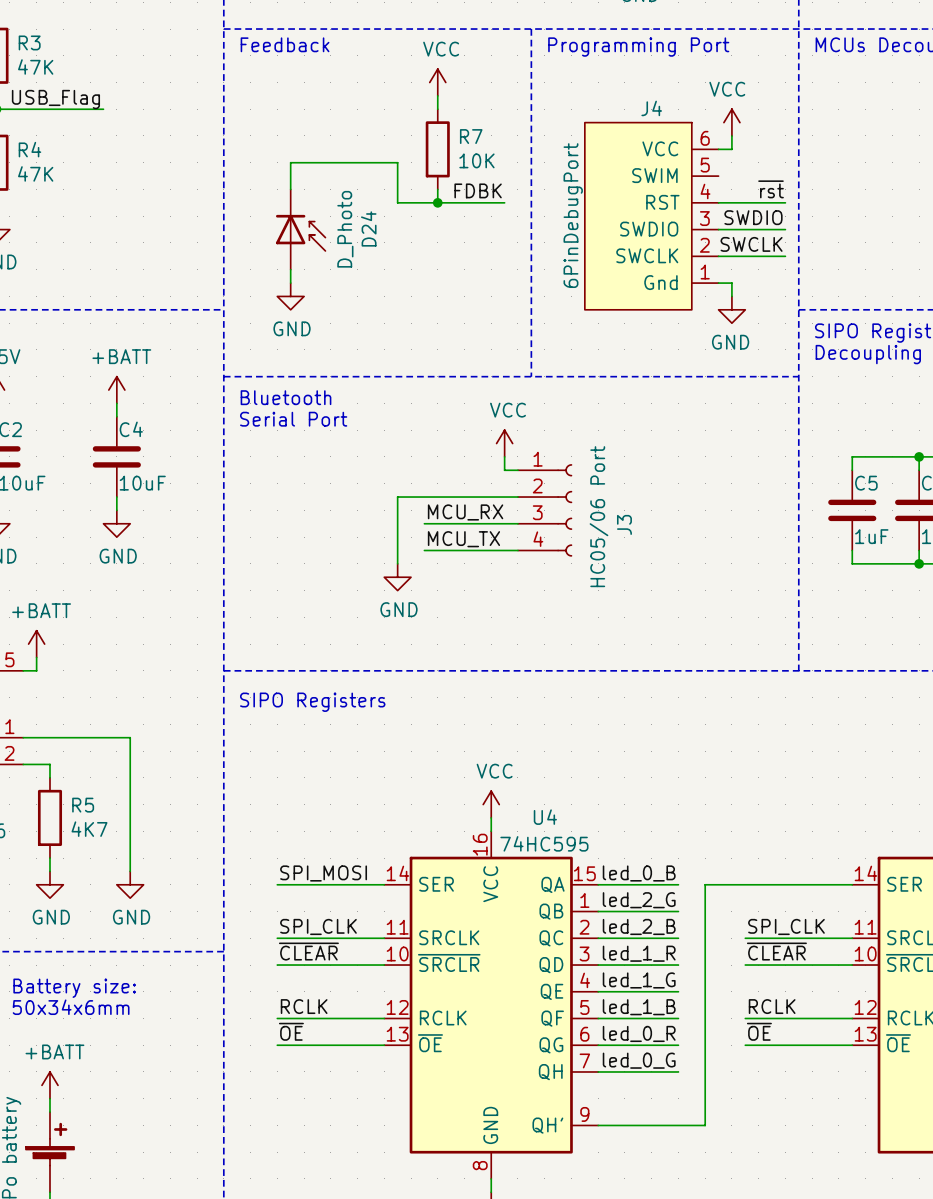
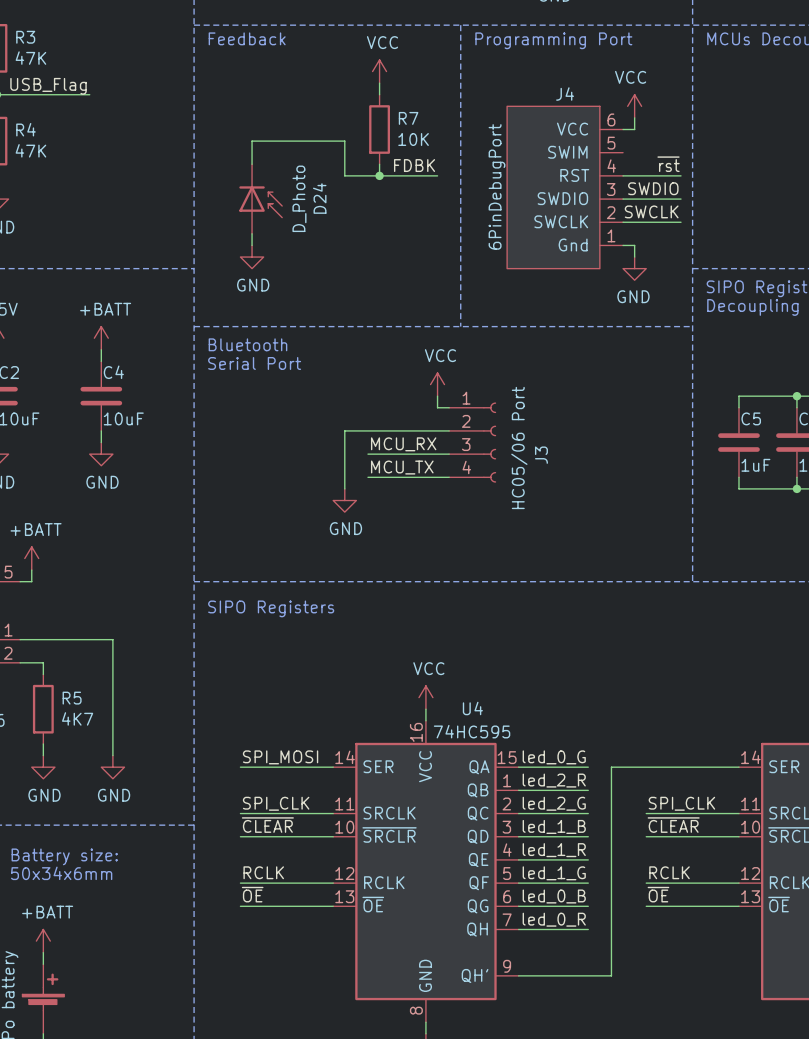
label: led_0_B (639, 873) -> led_0_G (554, 757)
label: led_2_G (639, 900) -> led_2_R (554, 780)
label: led_2_B (639, 926) -> led_2_G (554, 803)
label: led_1_R (639, 953) -> led_1_B (554, 826)
label: led_1_G (639, 980) -> led_1_R (554, 850)
label: led_1_B (639, 1007) -> led_1_G (554, 873)
label: led_0_R (639, 1033) -> led_0_B (554, 896)
label: led_0_G (639, 1060) -> led_0_R (554, 919)

